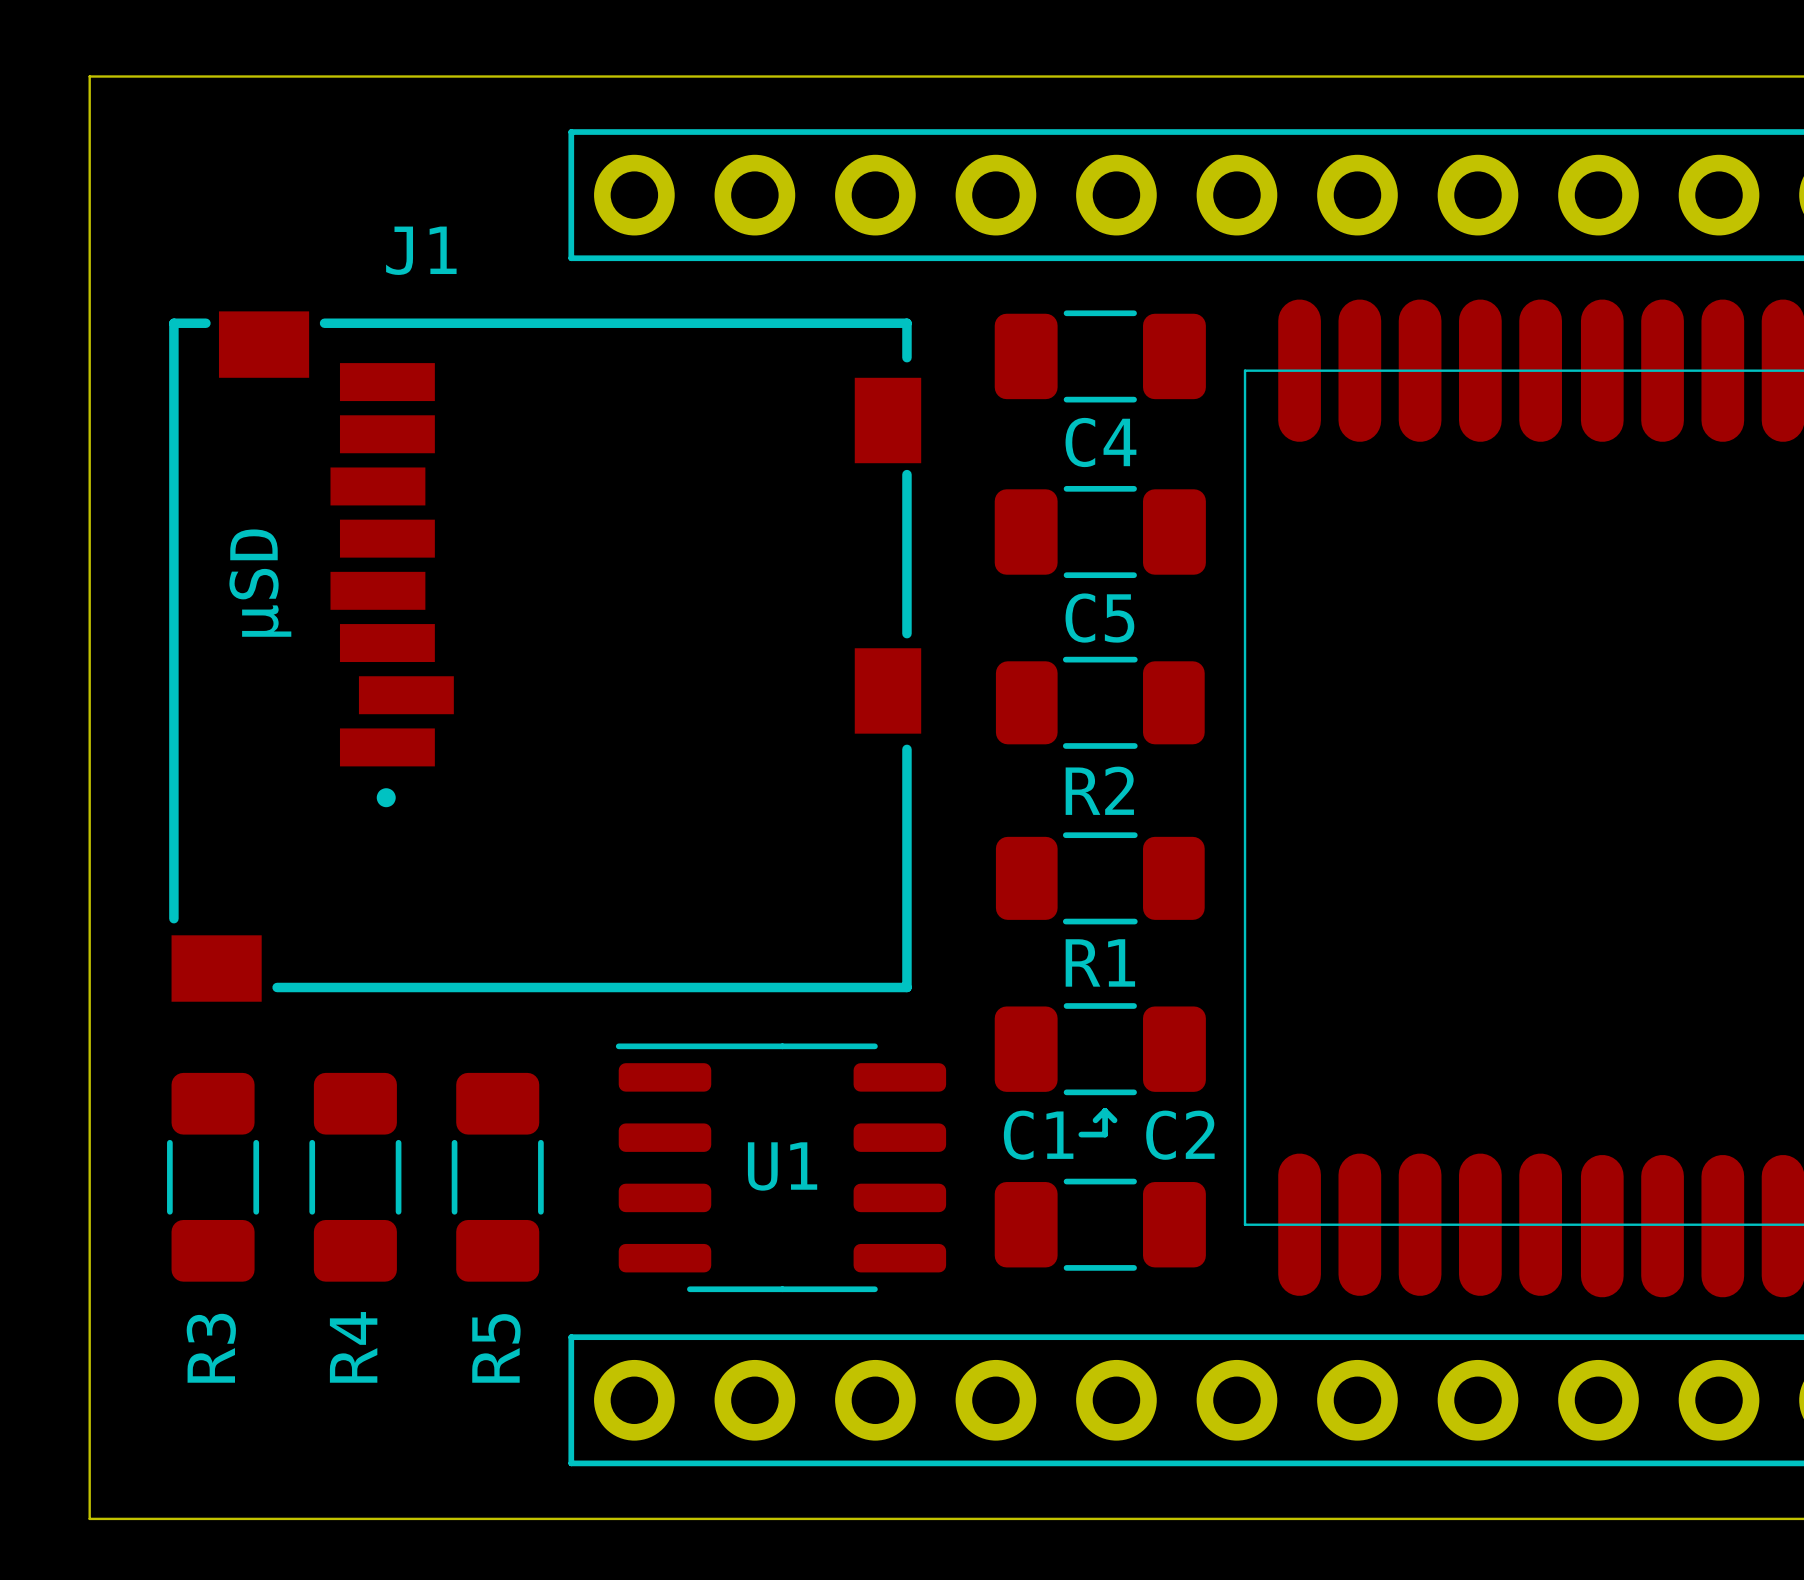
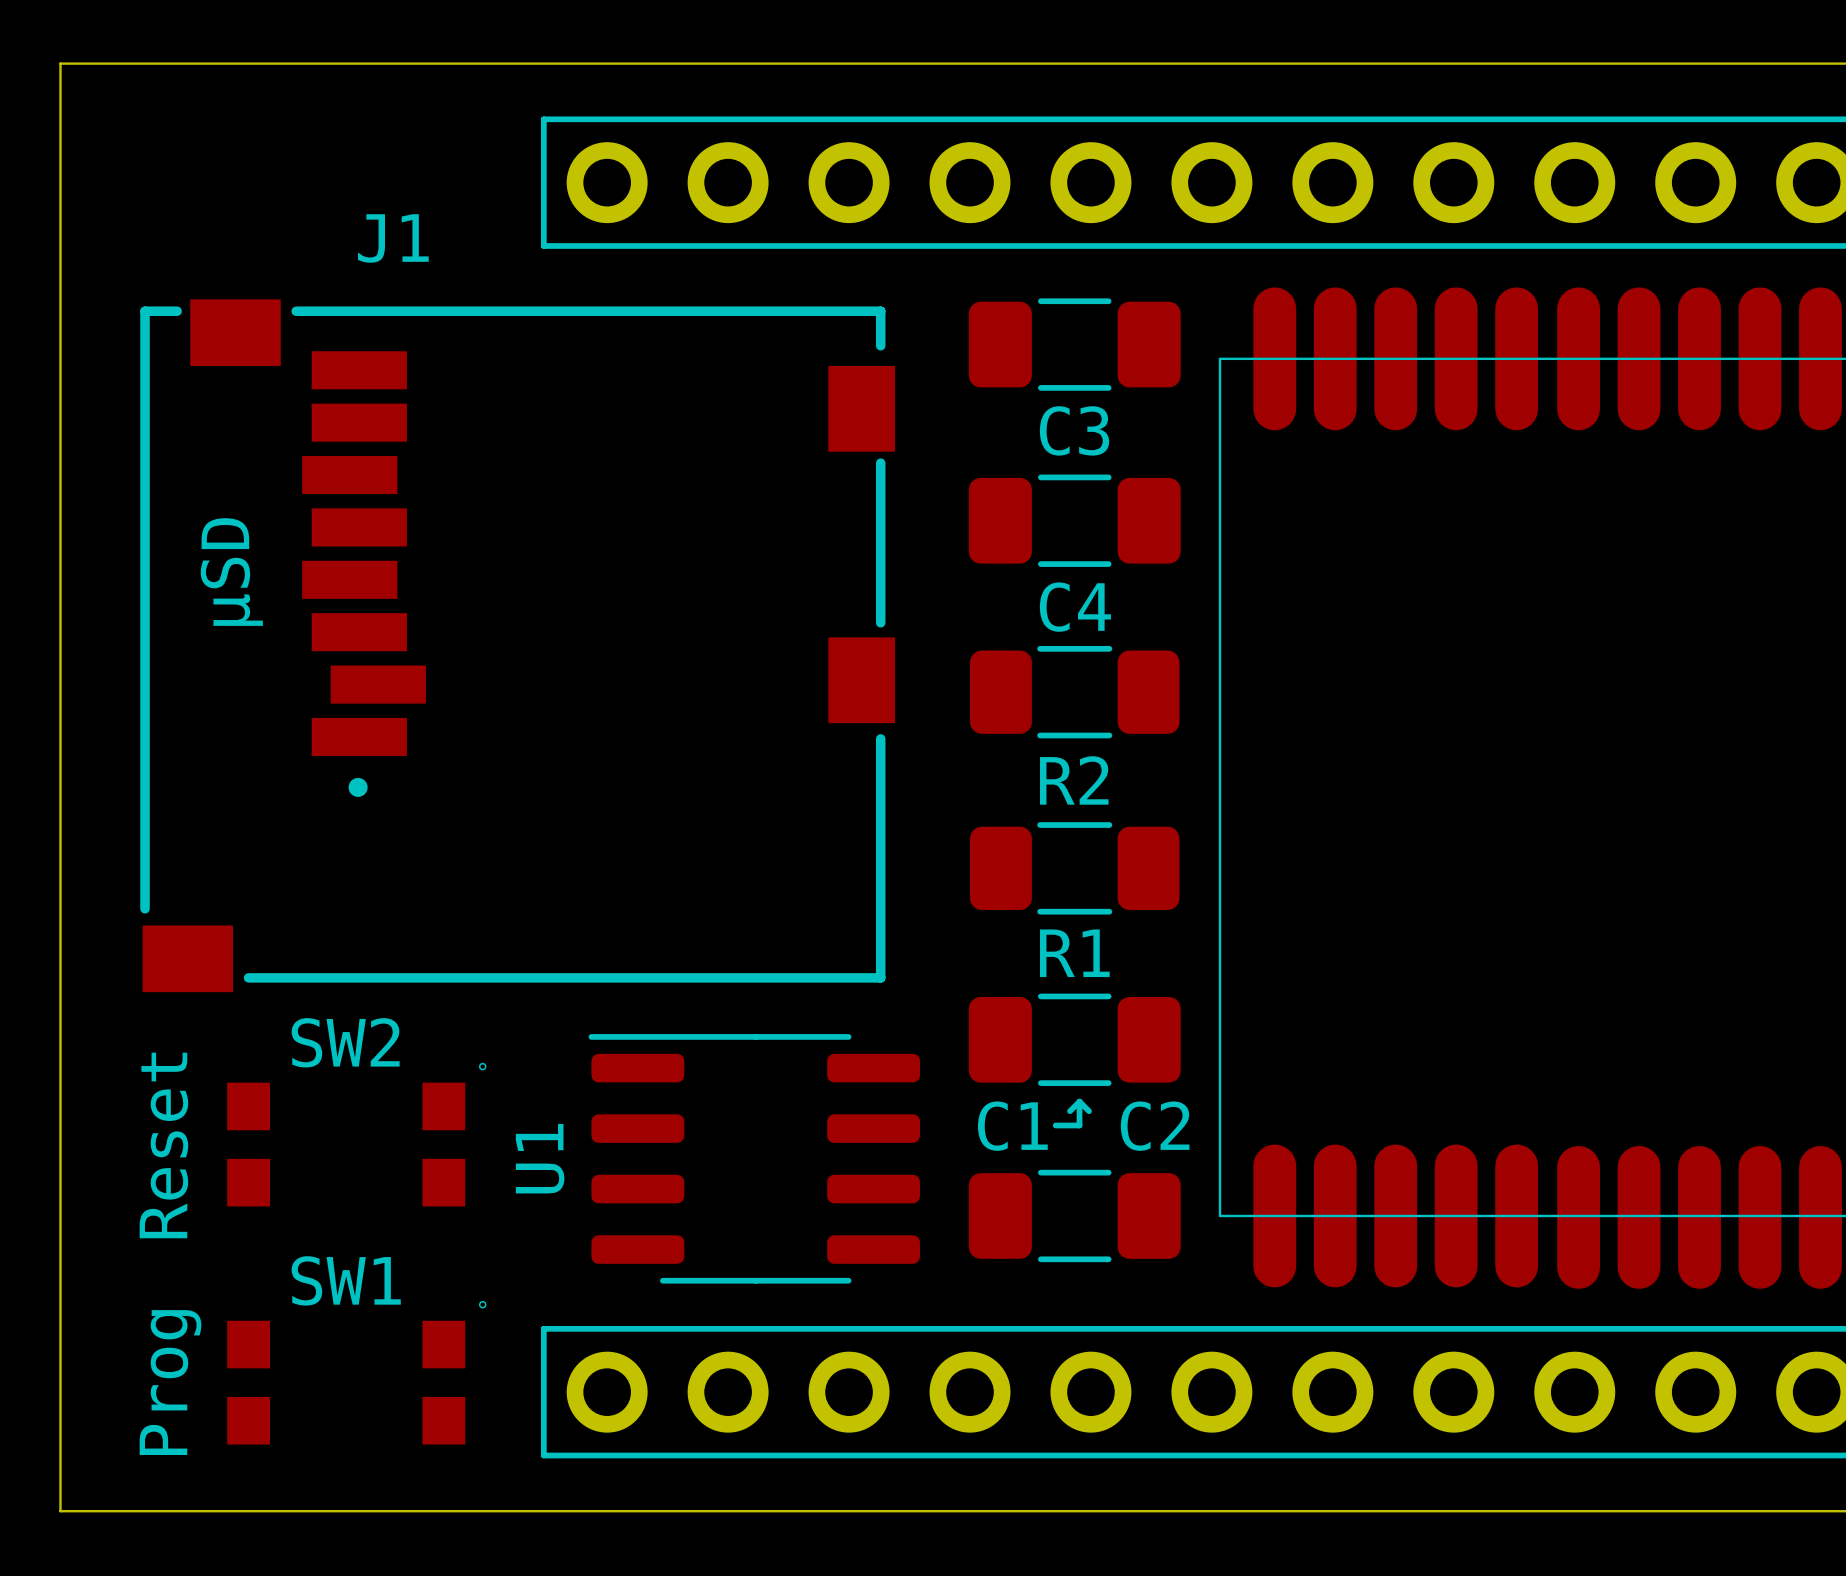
C4 name: C4 (1100, 442) -> C3 (1074, 430)
C5 name: C5 (1099, 618) -> C4 (1075, 607)
SW2: none -> Reset (356, 1134)
U1 name rotation: 0° (782, 1166) -> 90° counterclockwise (540, 1158)
U1 name position: U1 (782, 1166) -> U1 (540, 1158)
R3: (213, 1177) -> none
R4: (355, 1177) -> none
R5: (497, 1177) -> none
SW1: none -> Prog (356, 1372)

